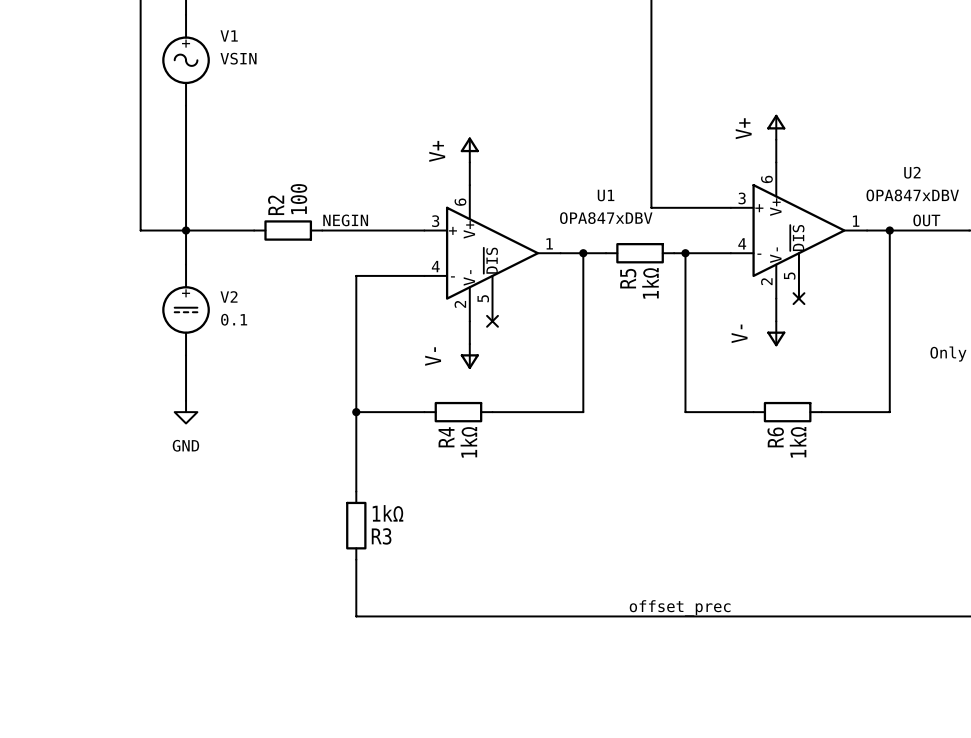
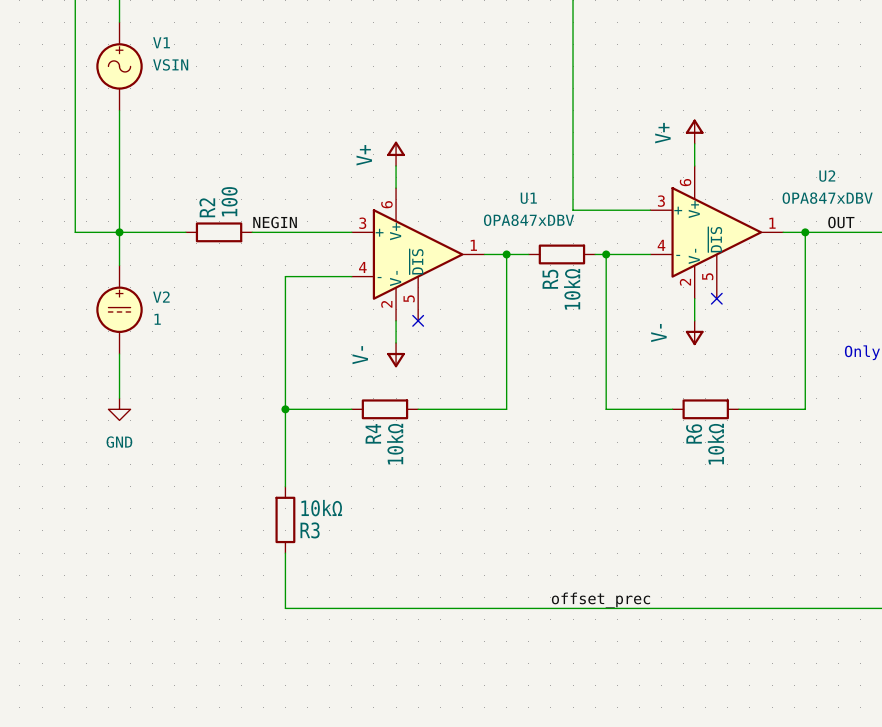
R5 value: 1kΩ (650, 283) -> 10kΩ (572, 289)
V2 value: 0.1 (234, 319) -> 1 (157, 319)
R4 value: 1kΩ (468, 442) -> 10kΩ (395, 444)
R6 value: 1kΩ (798, 442) -> 10kΩ (716, 444)
R3 value: 1kΩ (388, 513) -> 10kΩ (321, 508)

